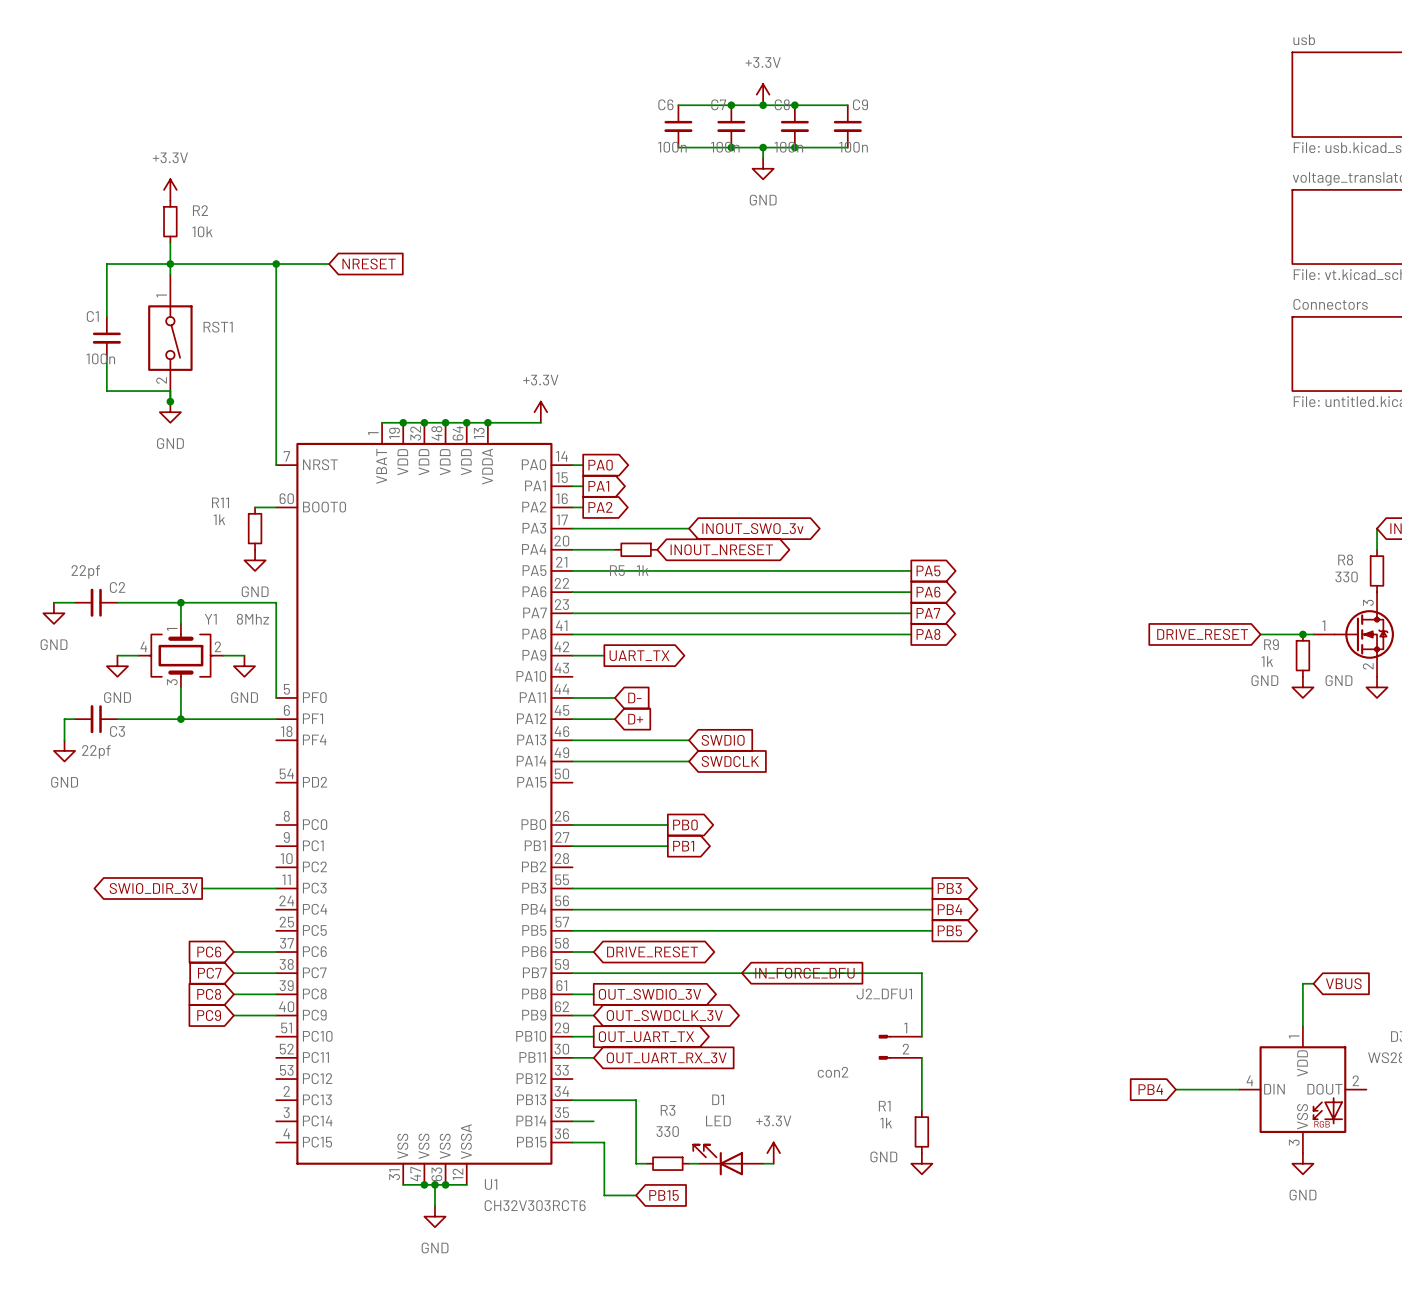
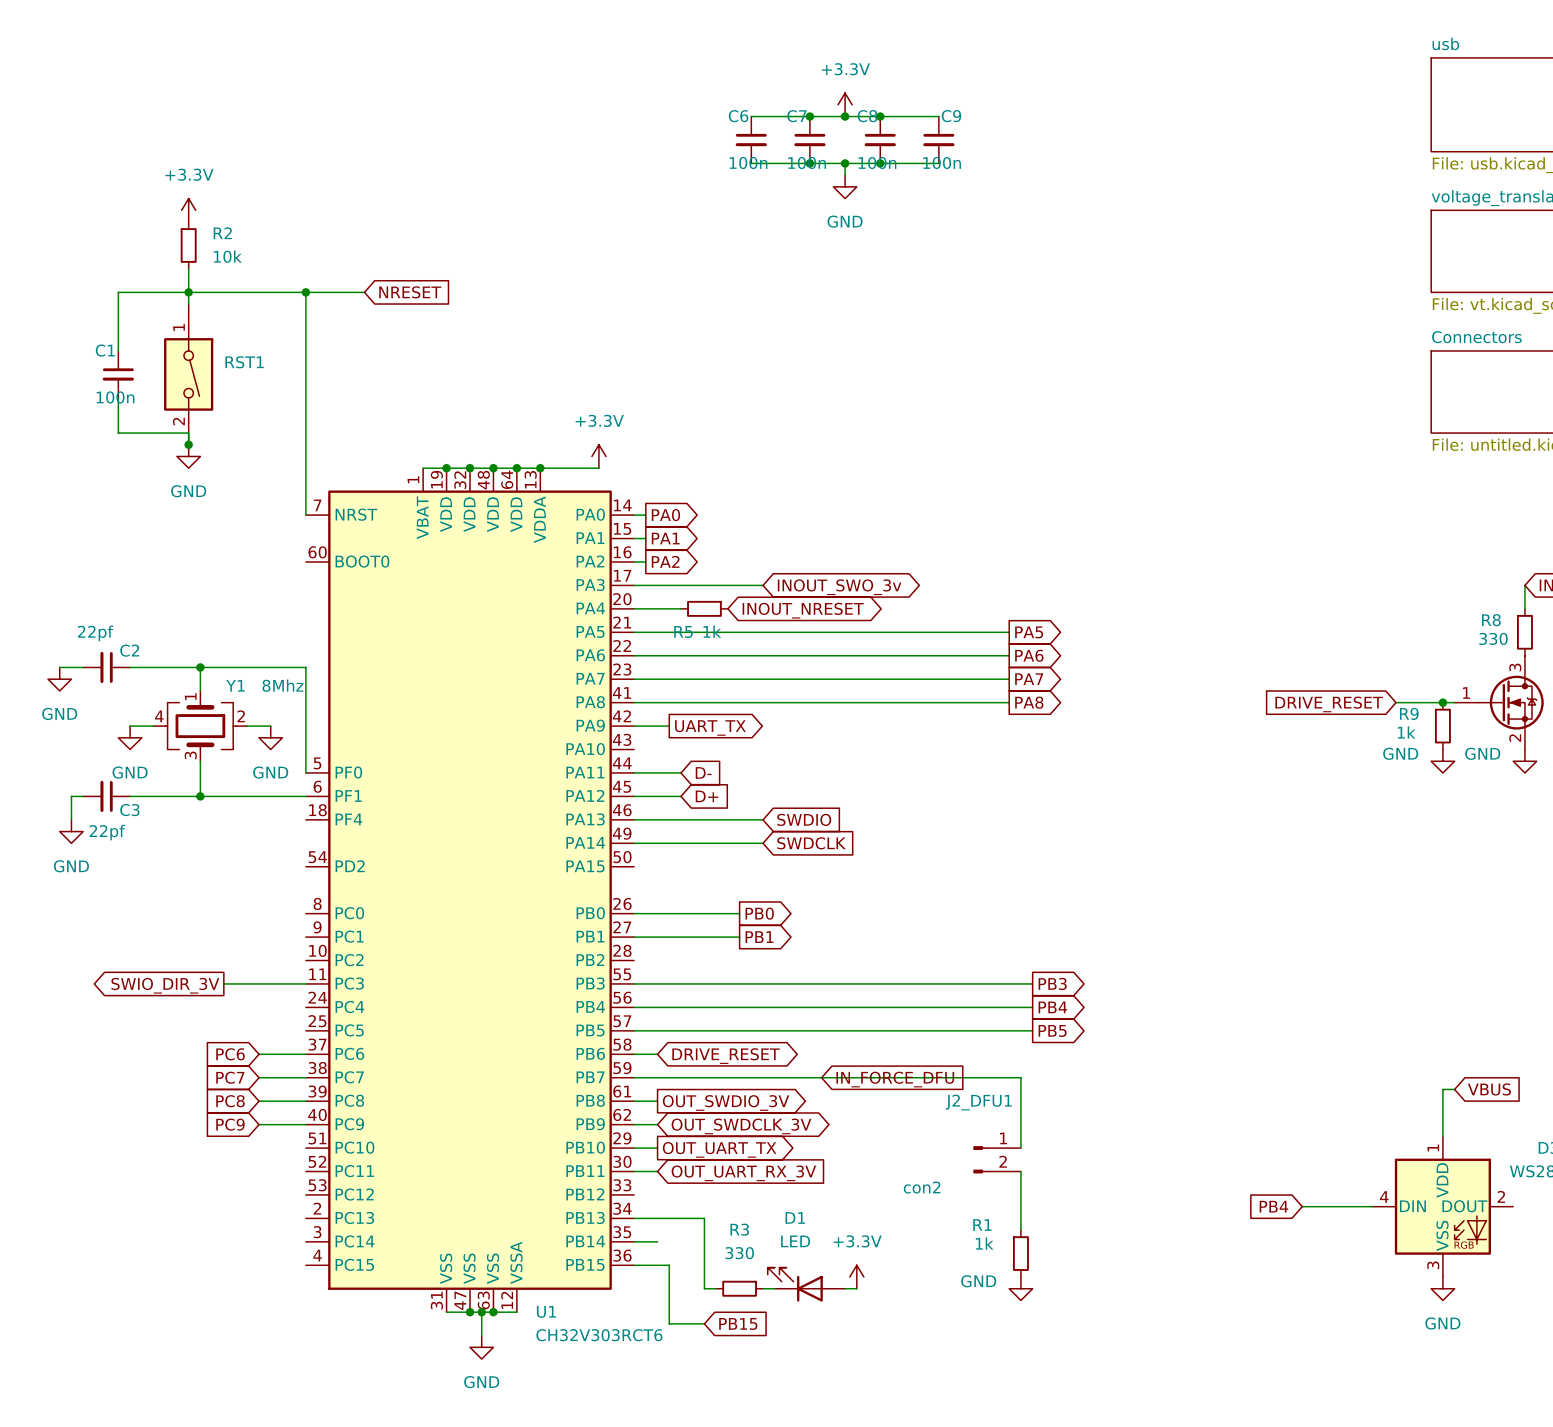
wire: (255, 507) (276, 507) -> none
R11: 1k (255, 528) -> none
power symbol: GND (255, 560) -> none

